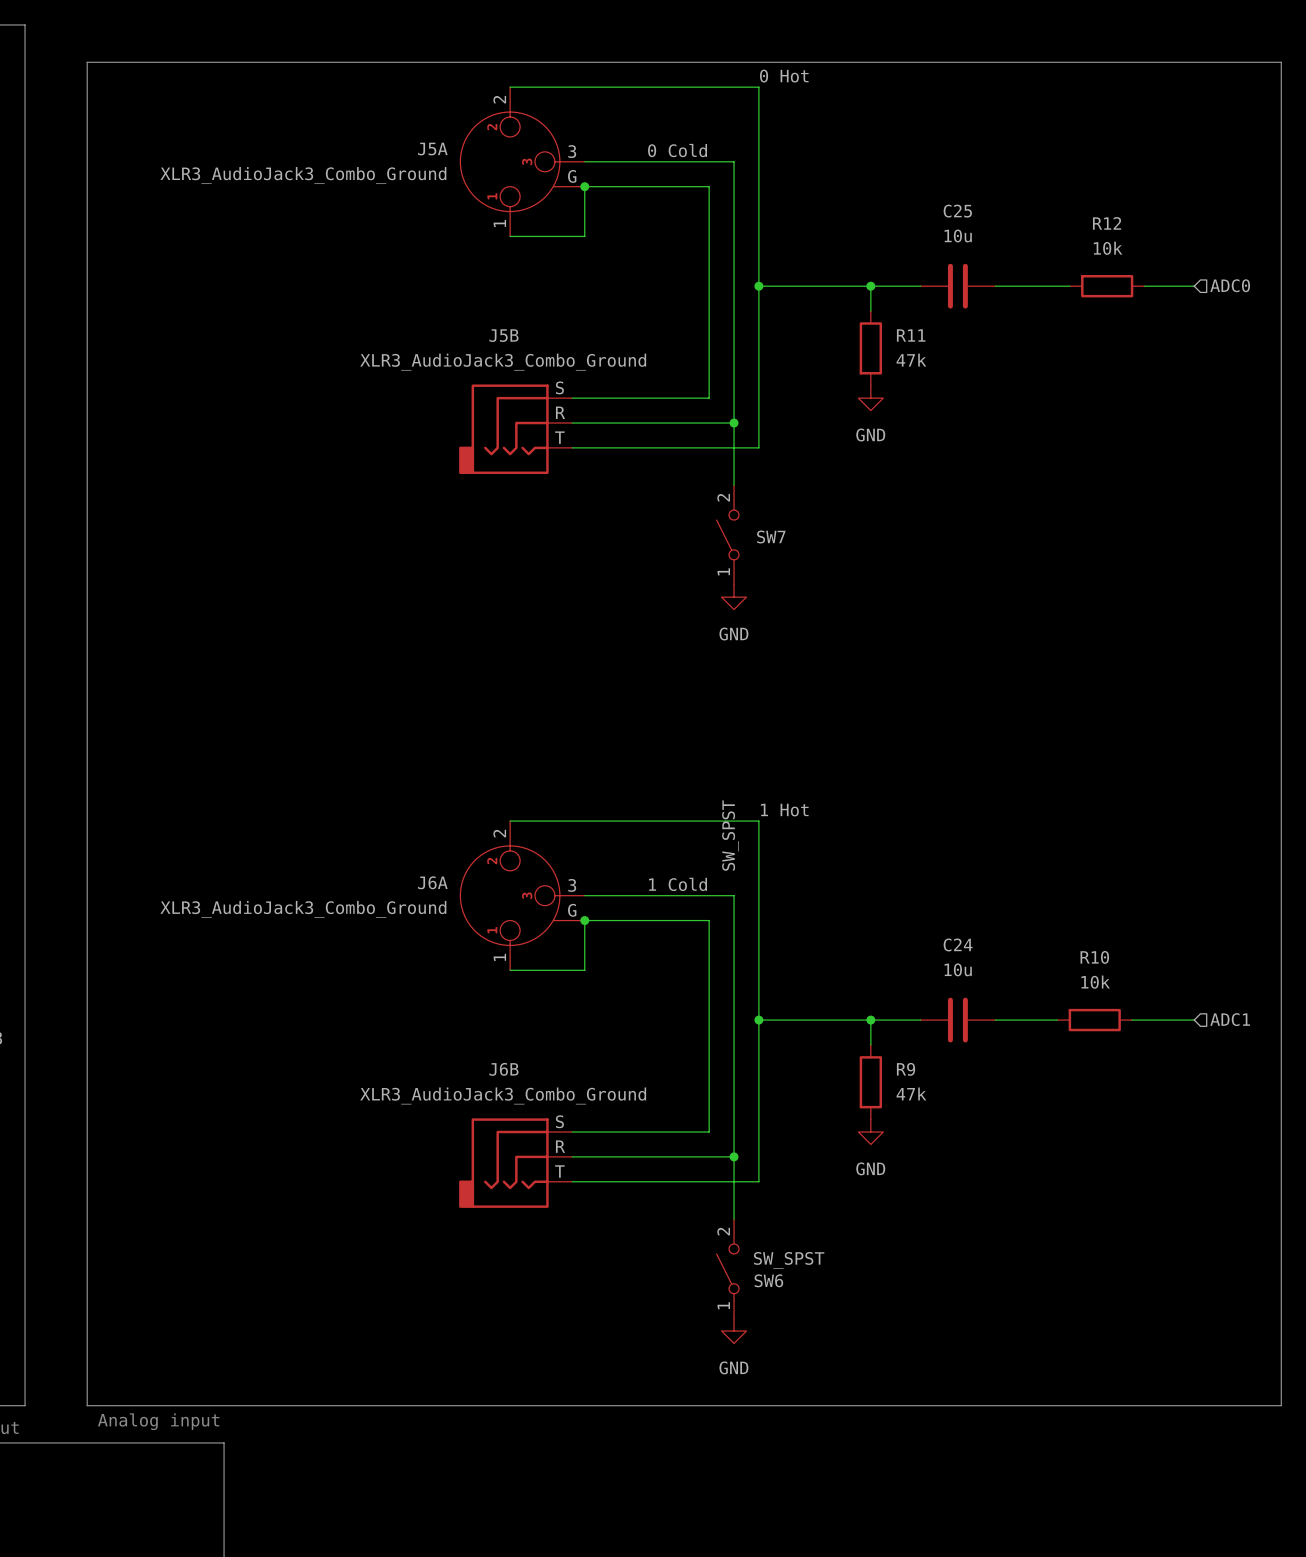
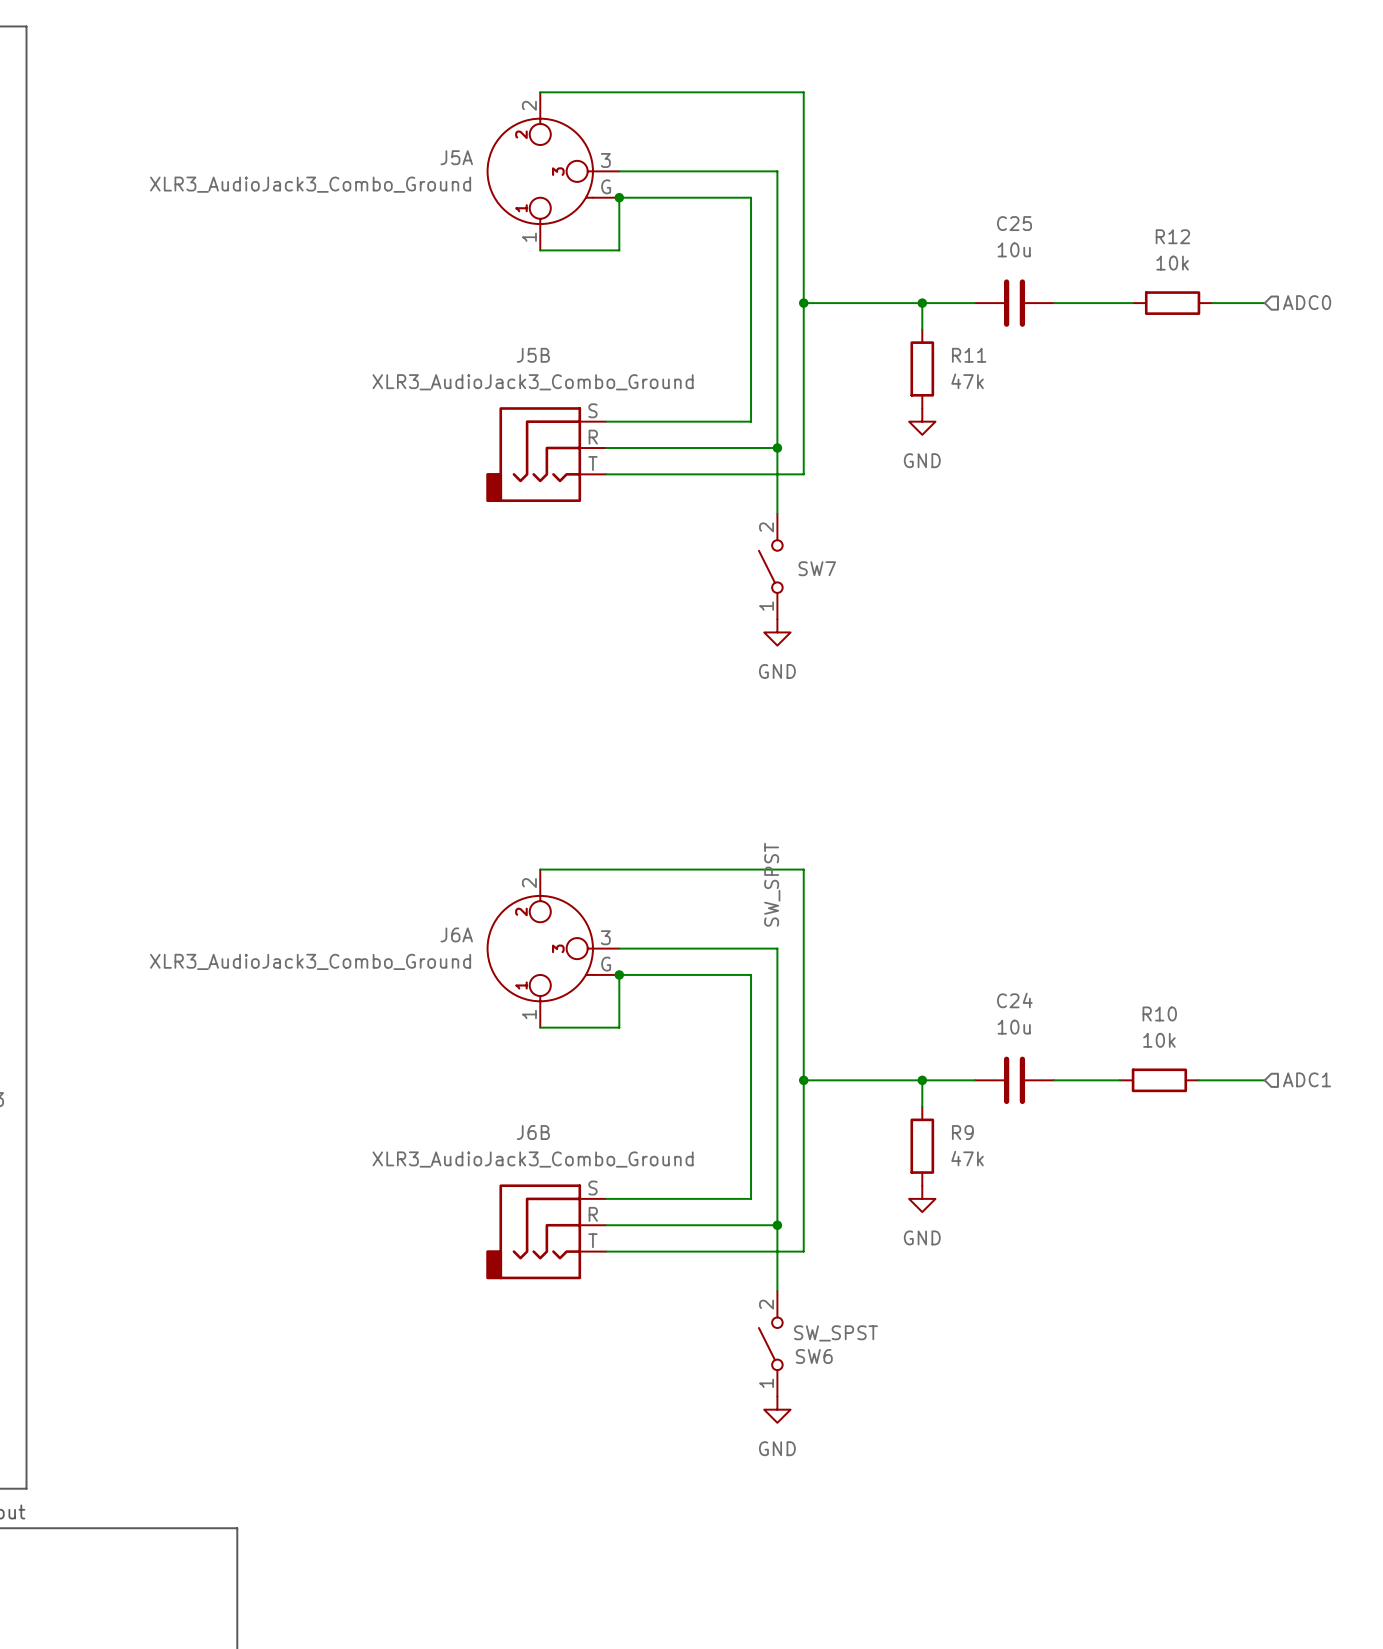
line: (87, 62) (1281, 62) (1281, 1405) (87, 1405) (87, 62) -> none
label: 0 Hot (784, 76) -> none
label: 0 Cold (677, 150) -> none
label: 1 Hot (784, 810) -> none
label: 1 Cold (678, 884) -> none
text: Analog input (158, 1421) -> none

